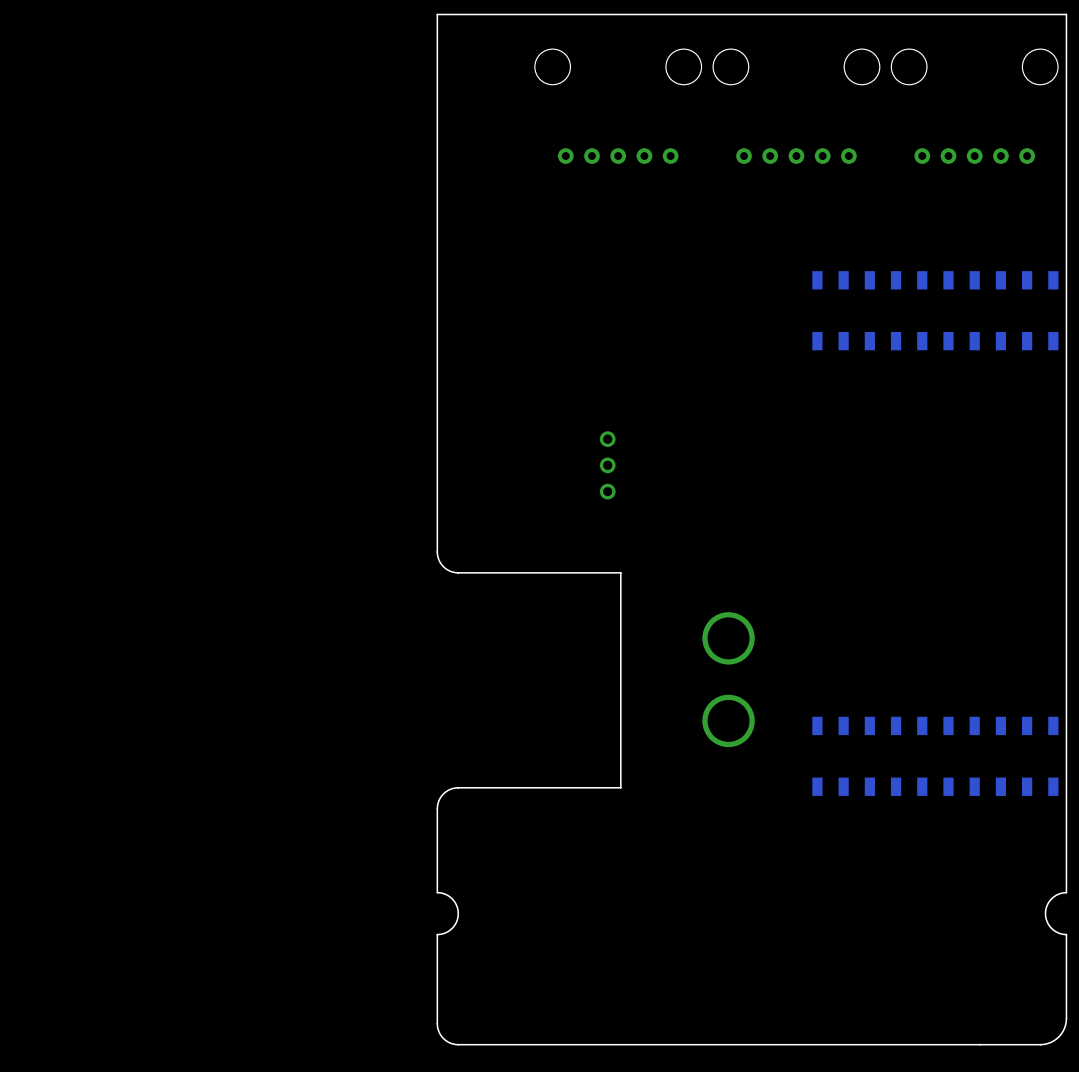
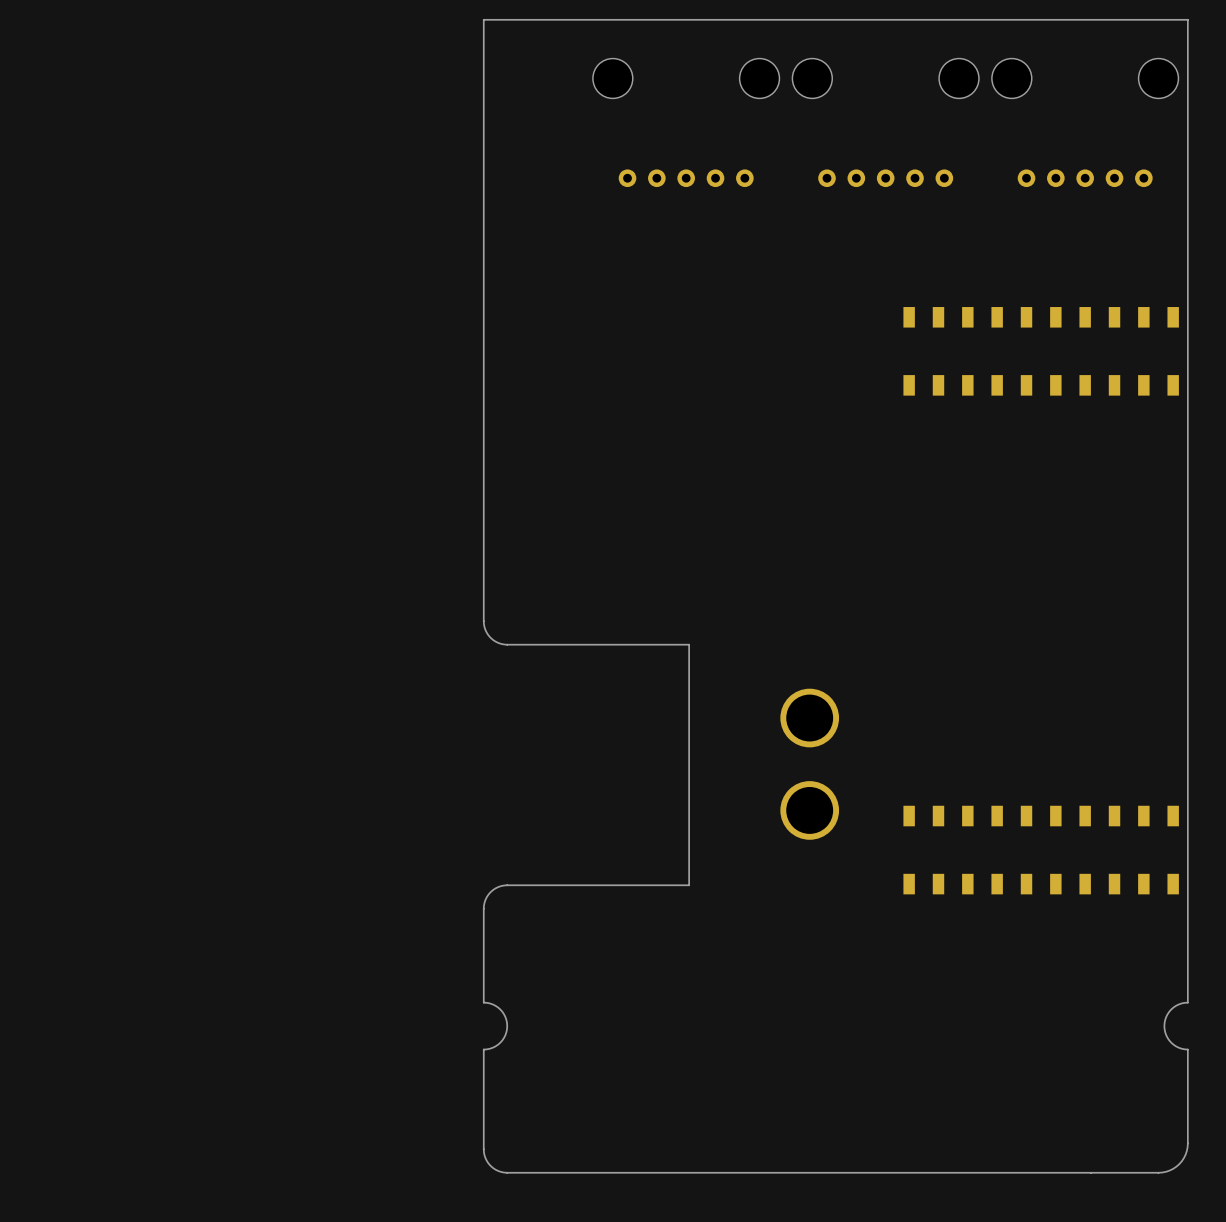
part: (607, 465) -> none

